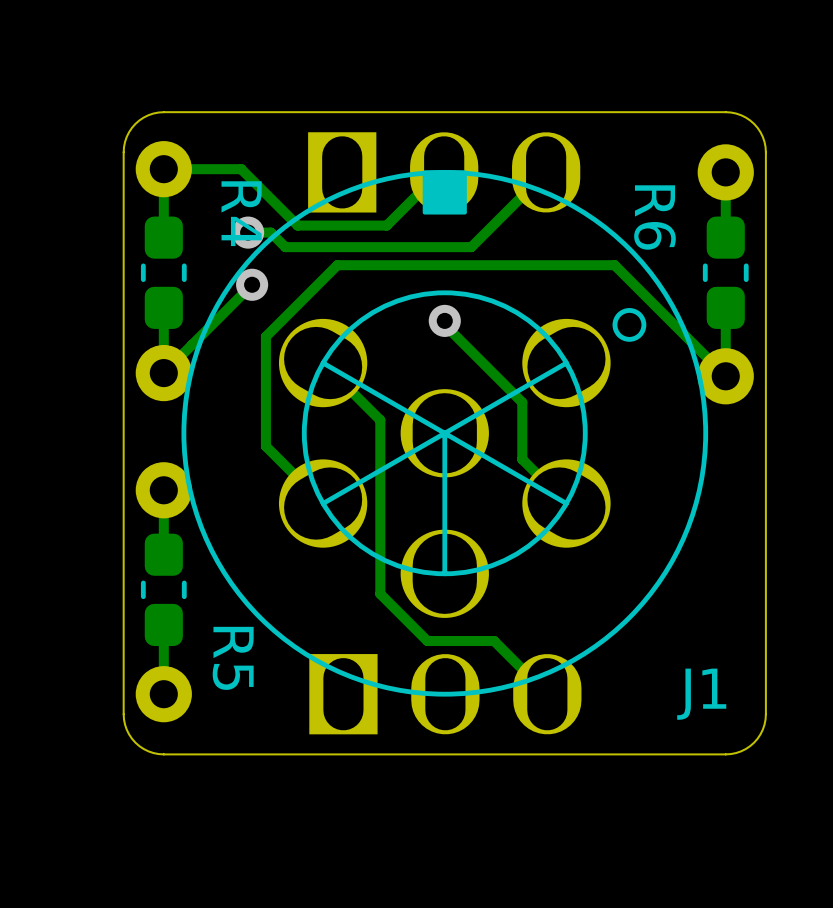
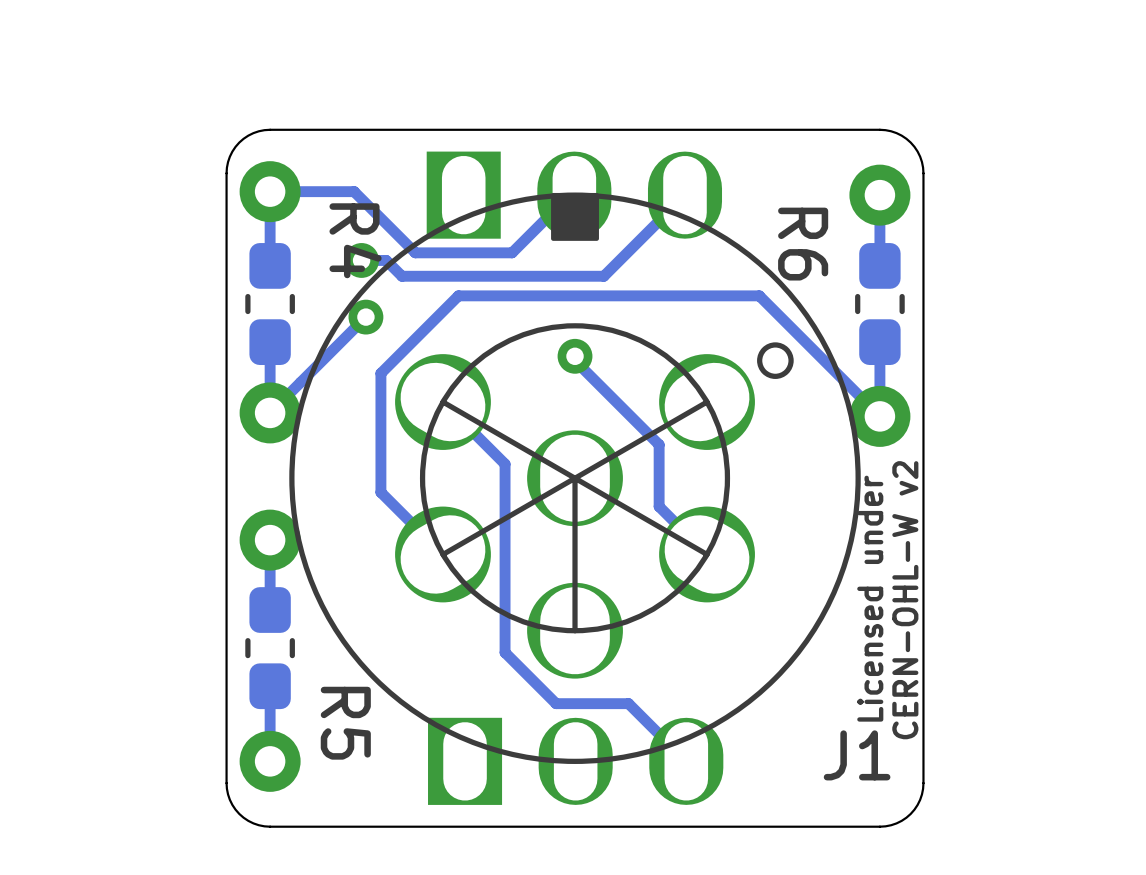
text: none -> Licensed under (870, 598)
text: none -> CERN-OHL-W v2 (905, 600)

